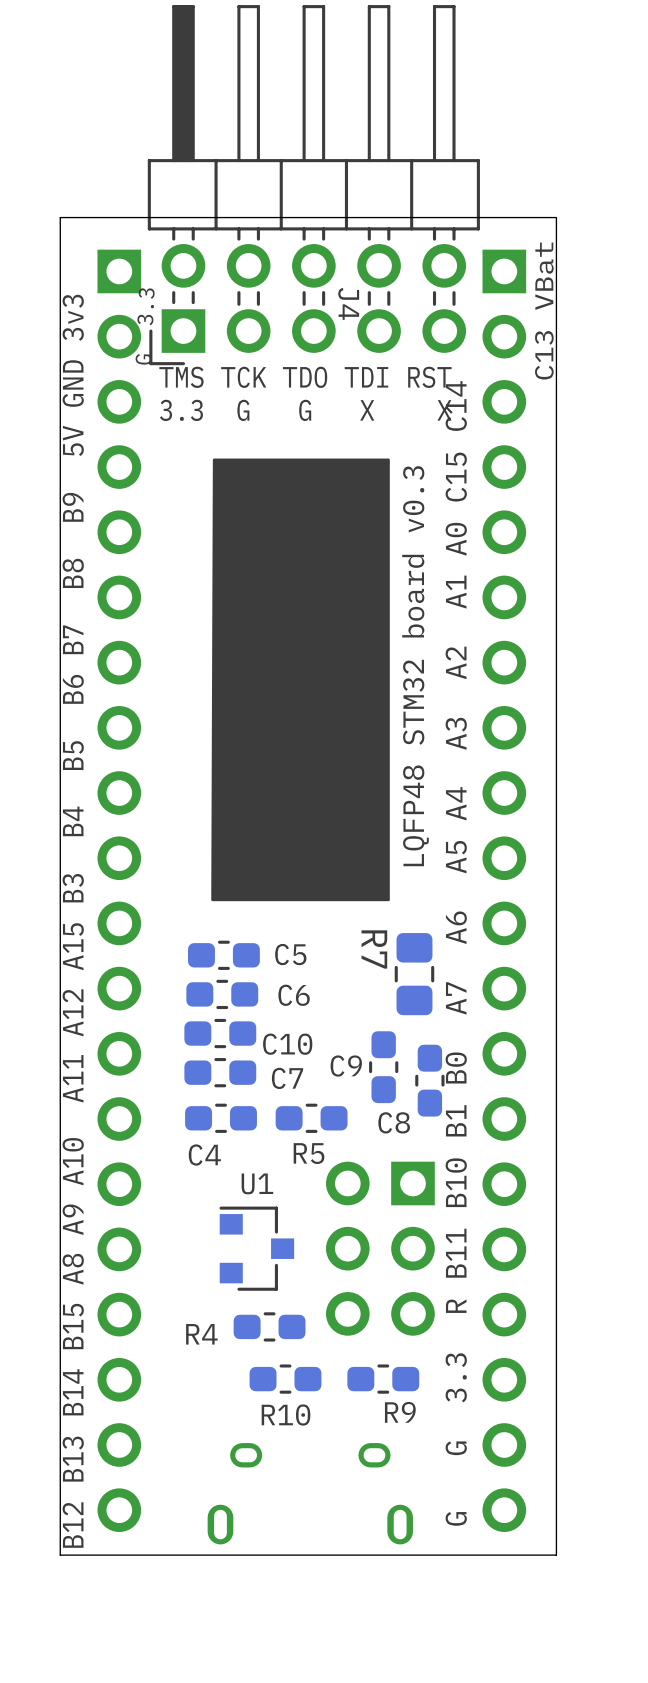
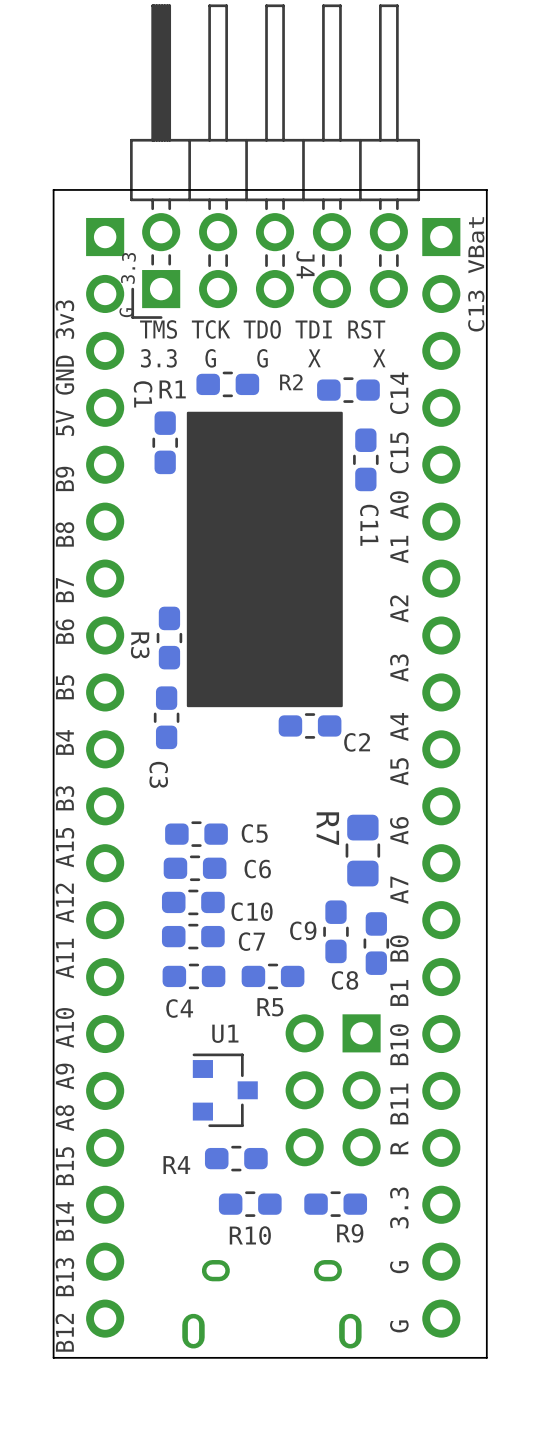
R1: none -> (227, 384)
R2: none -> (348, 390)
drawing: [211, 458, 390, 902] -> none
drawing: none -> [186, 411, 343, 708]
C1: none -> (165, 442)
C11: none -> (365, 459)
text: LQFP48 STM32 board v0.3 (415, 666) -> none
R3: none -> (169, 638)
C3: none -> (166, 717)
C2: none -> (310, 725)

